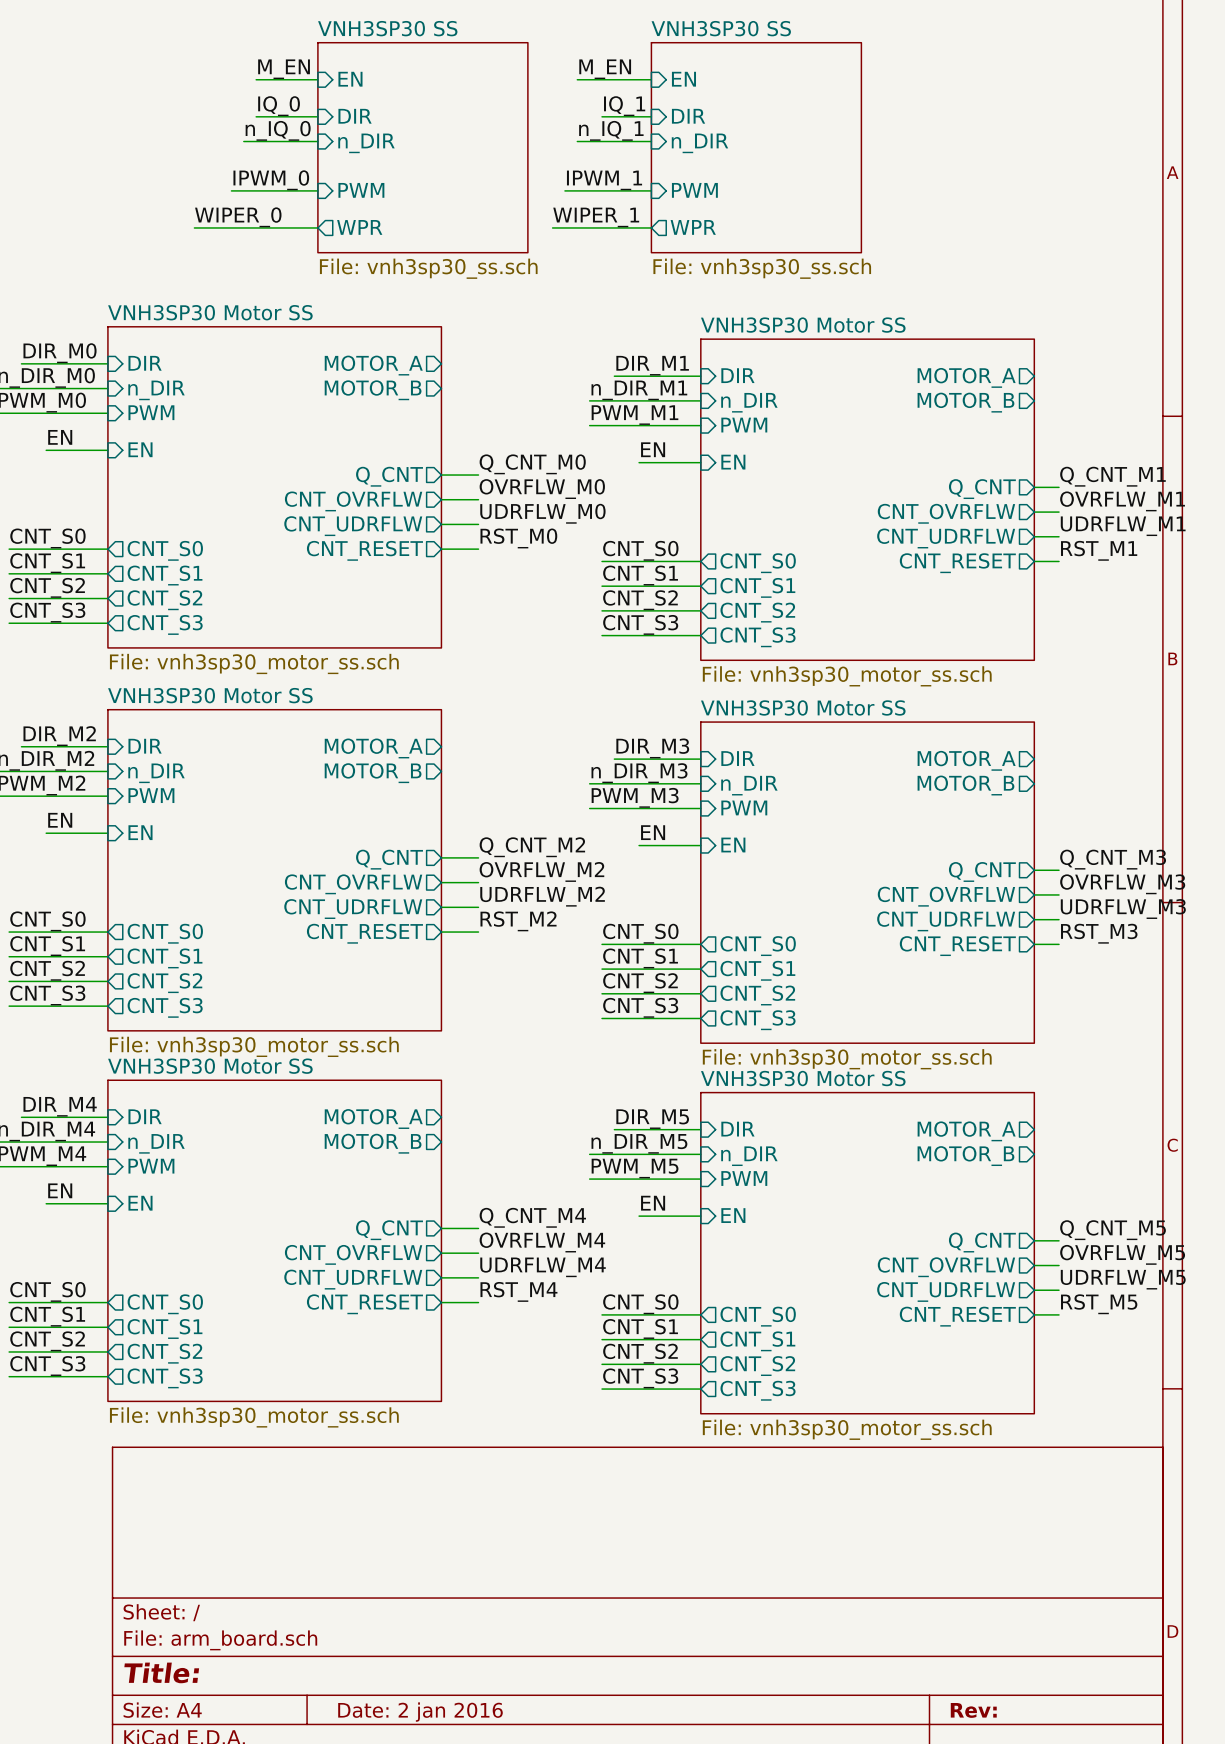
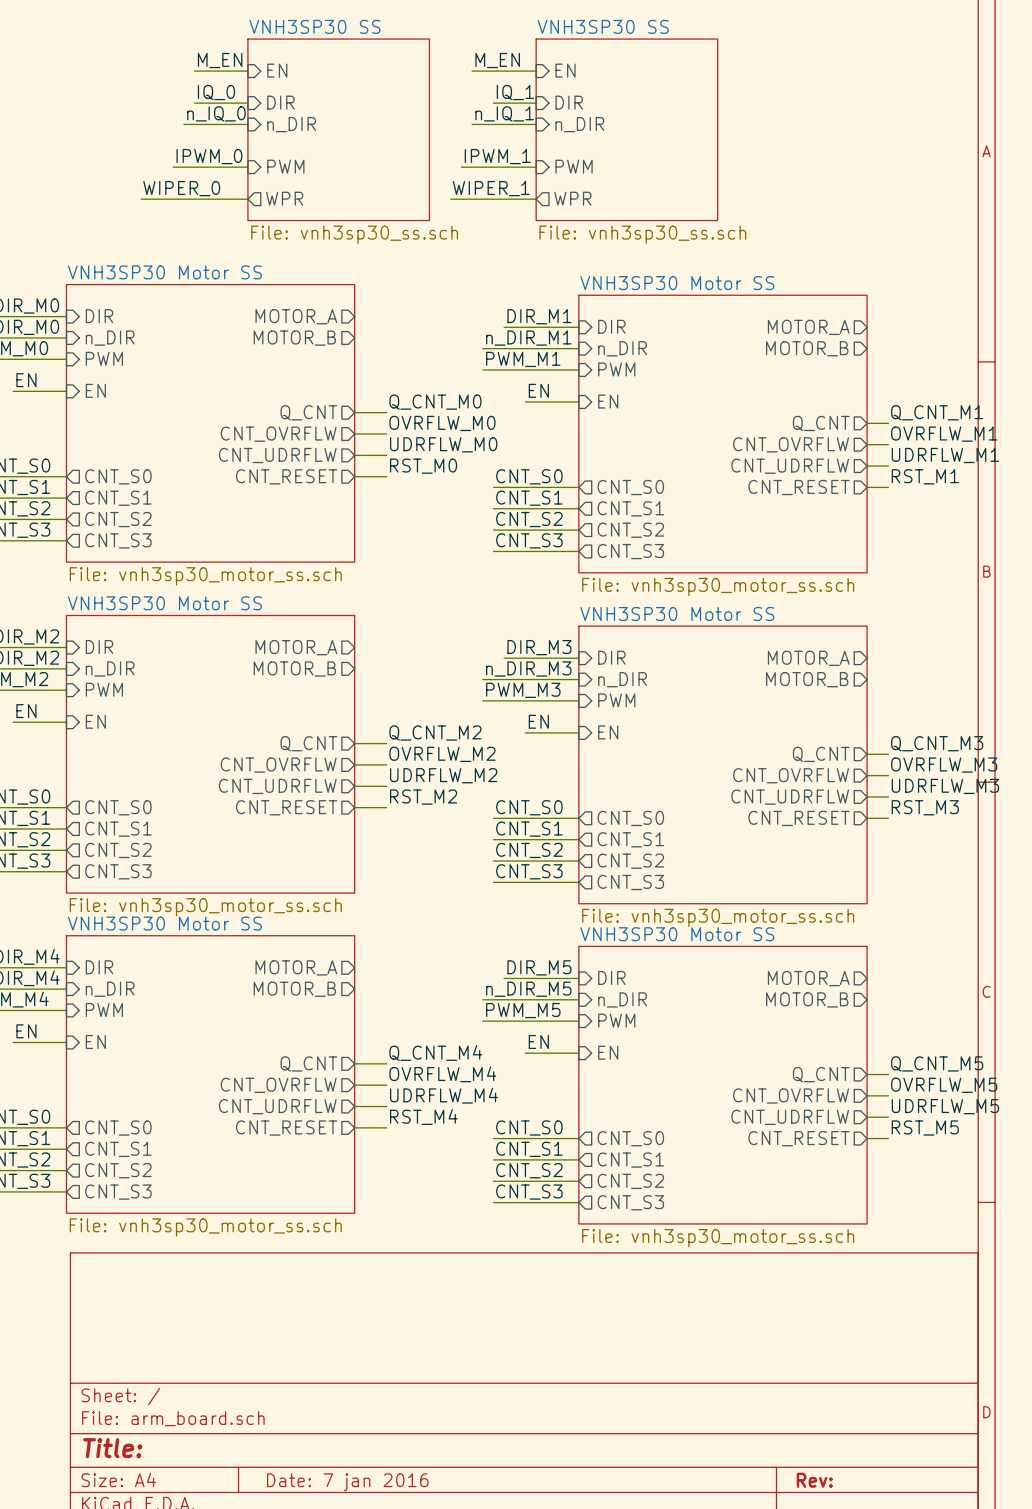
title block: Date: 2 jan 2016 (420, 1712) -> Date: 7 jan 2016 (347, 1482)

